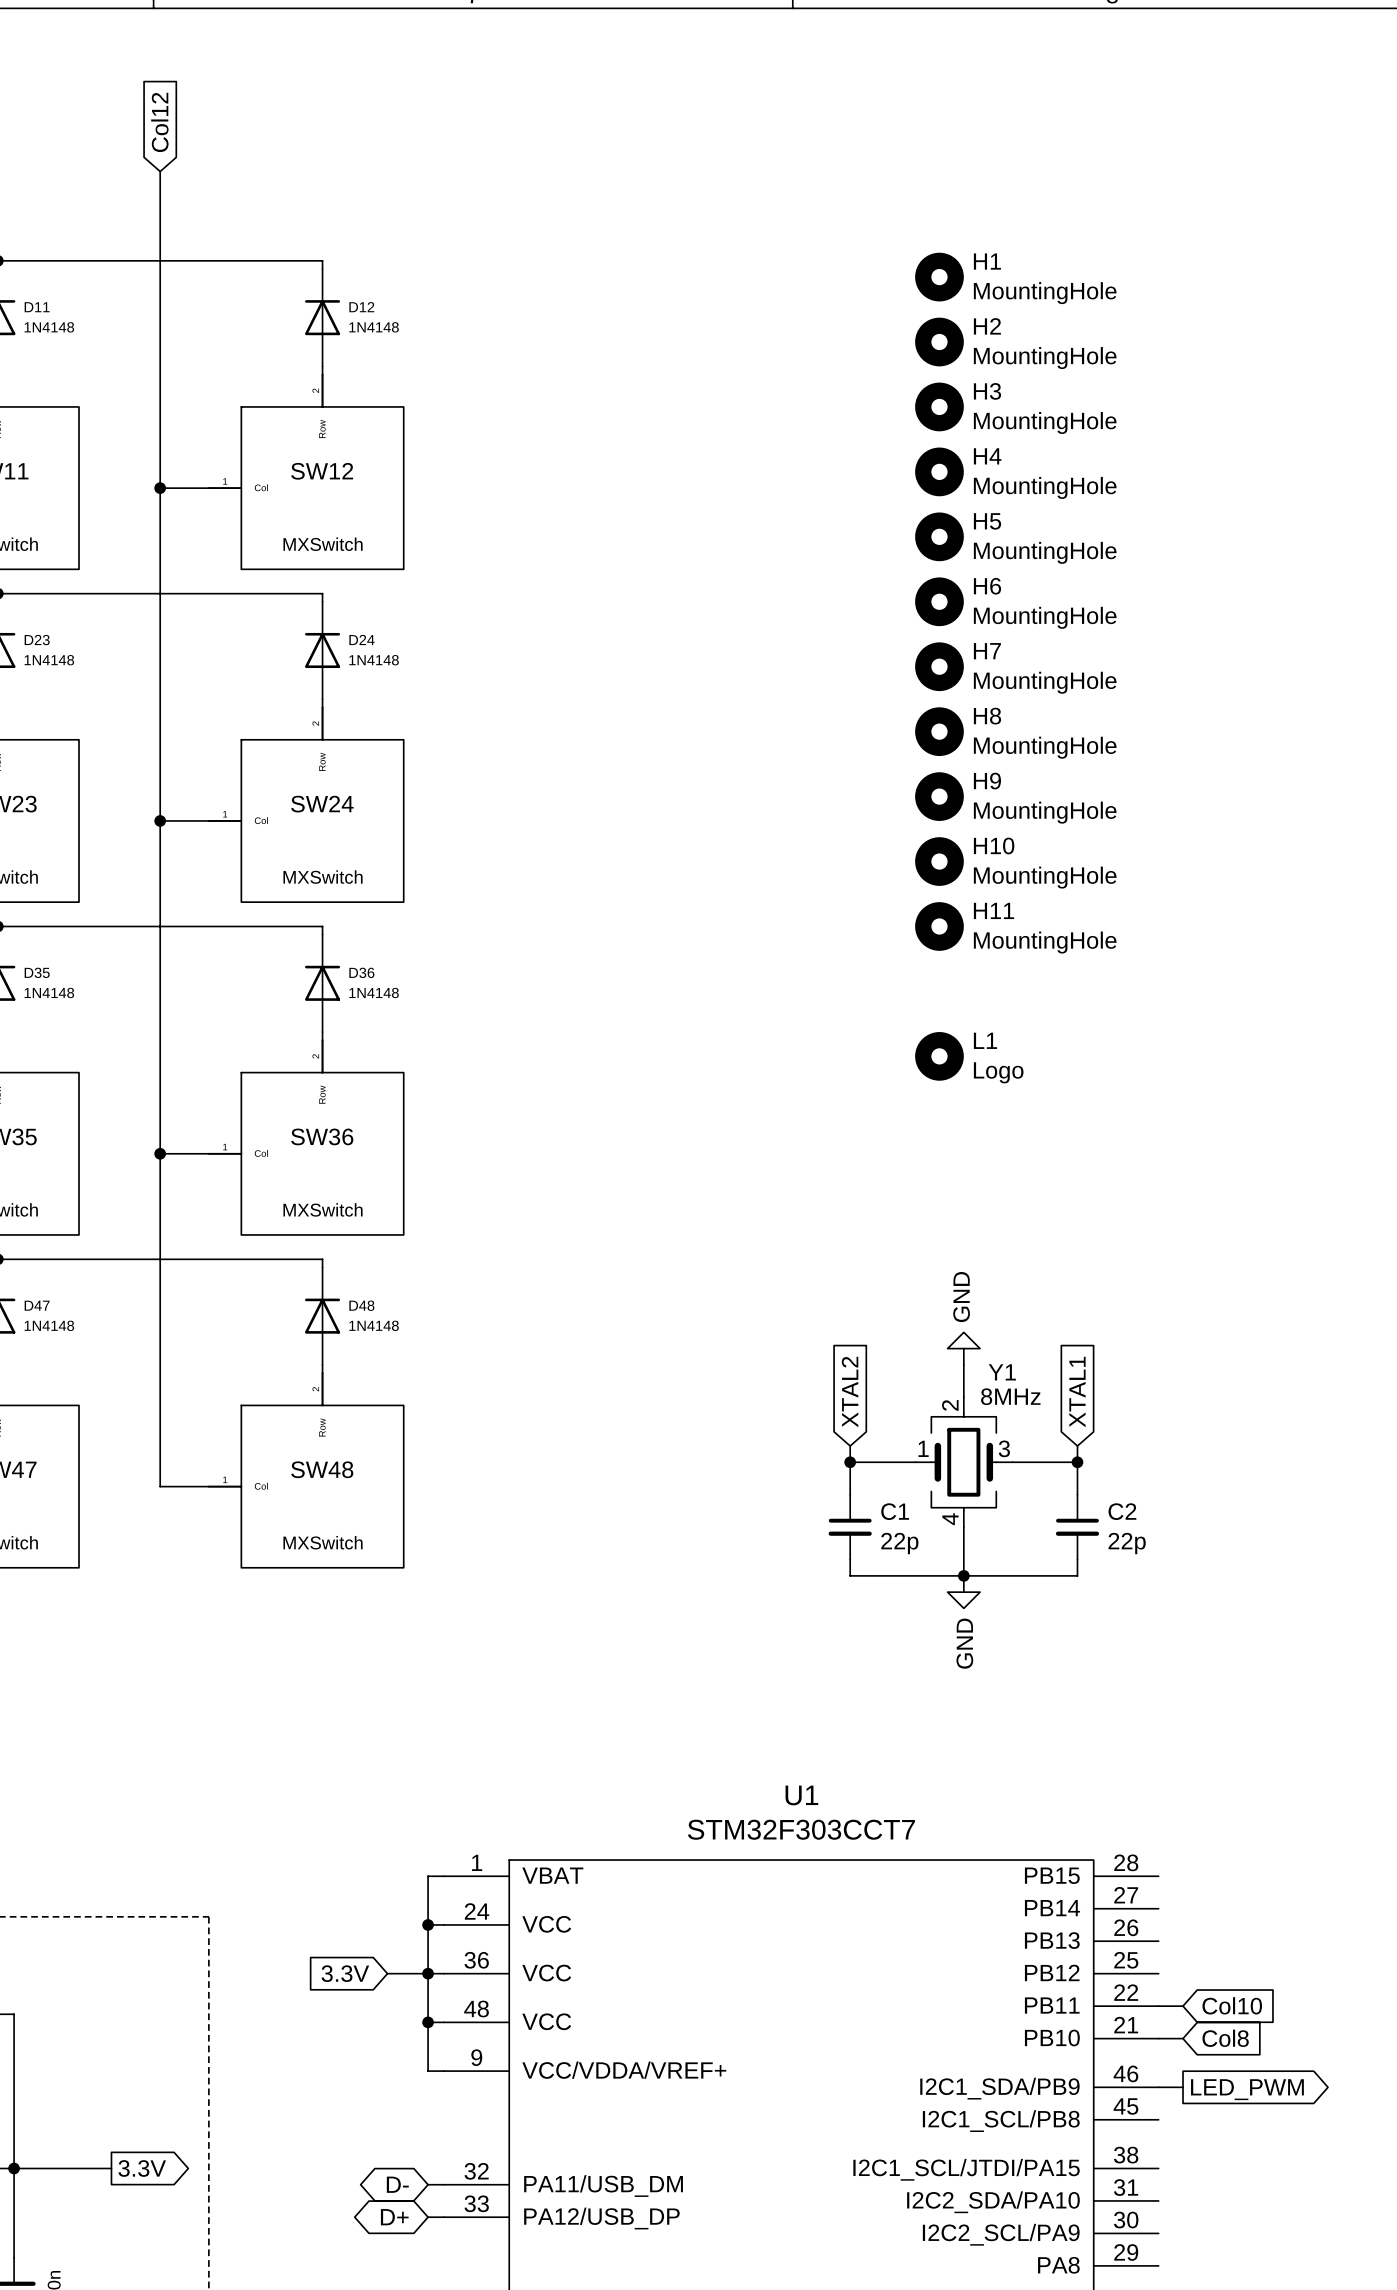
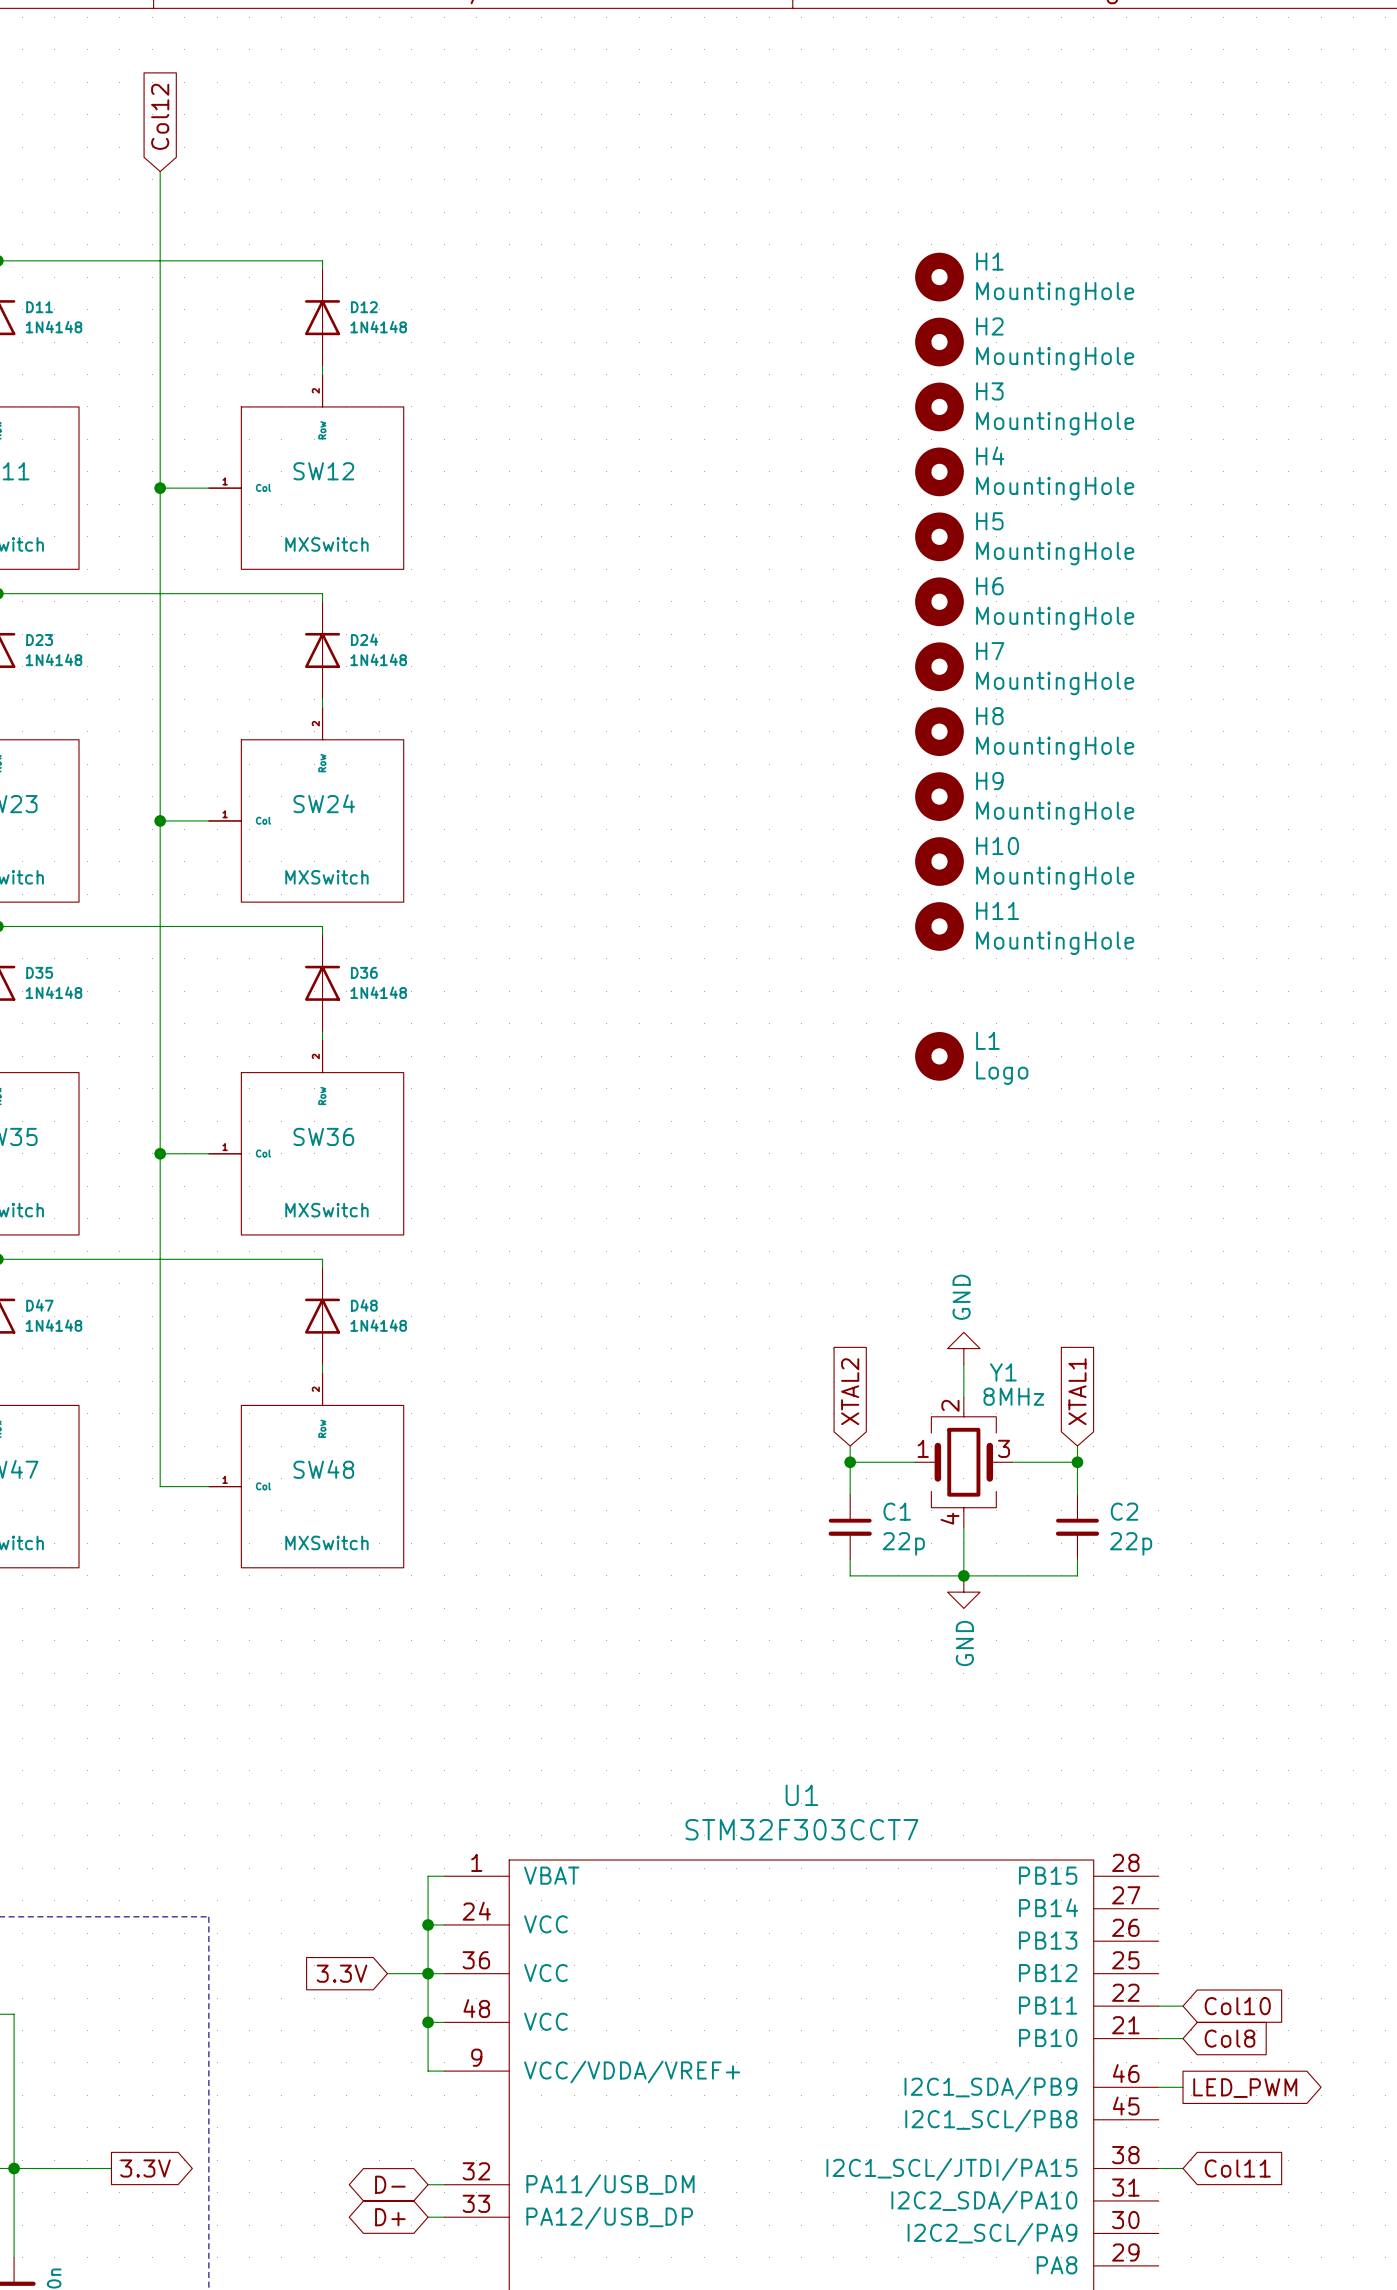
wire: none -> (1158, 2168) (1183, 2168)
global label: none -> Col11 (1237, 2168)

